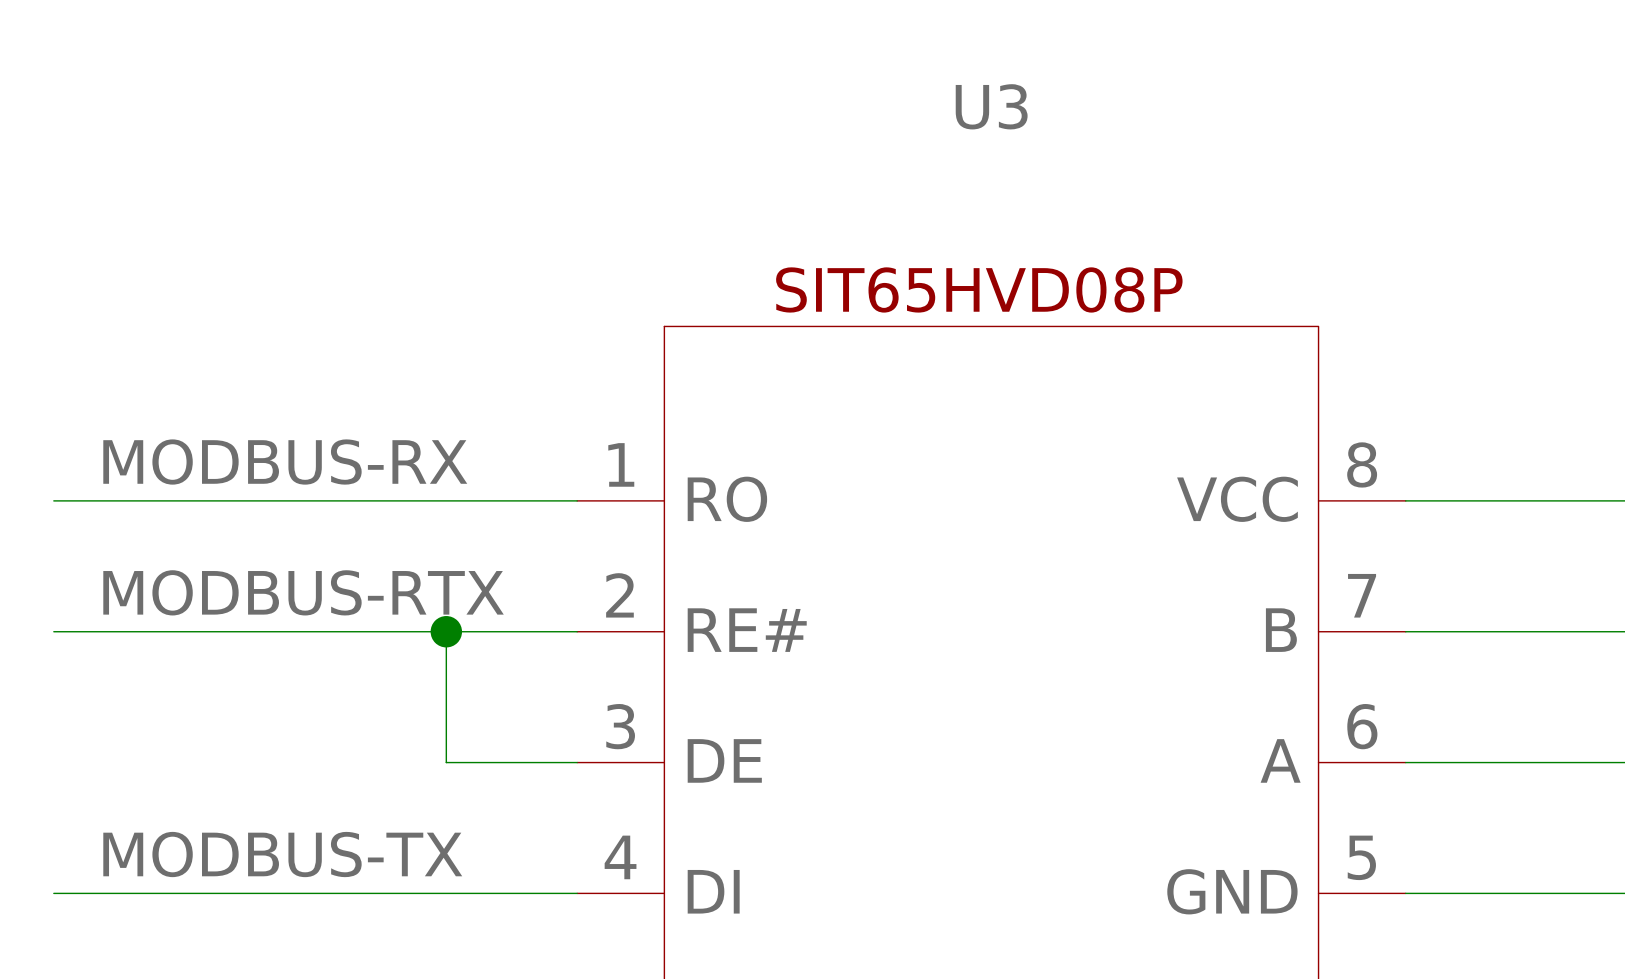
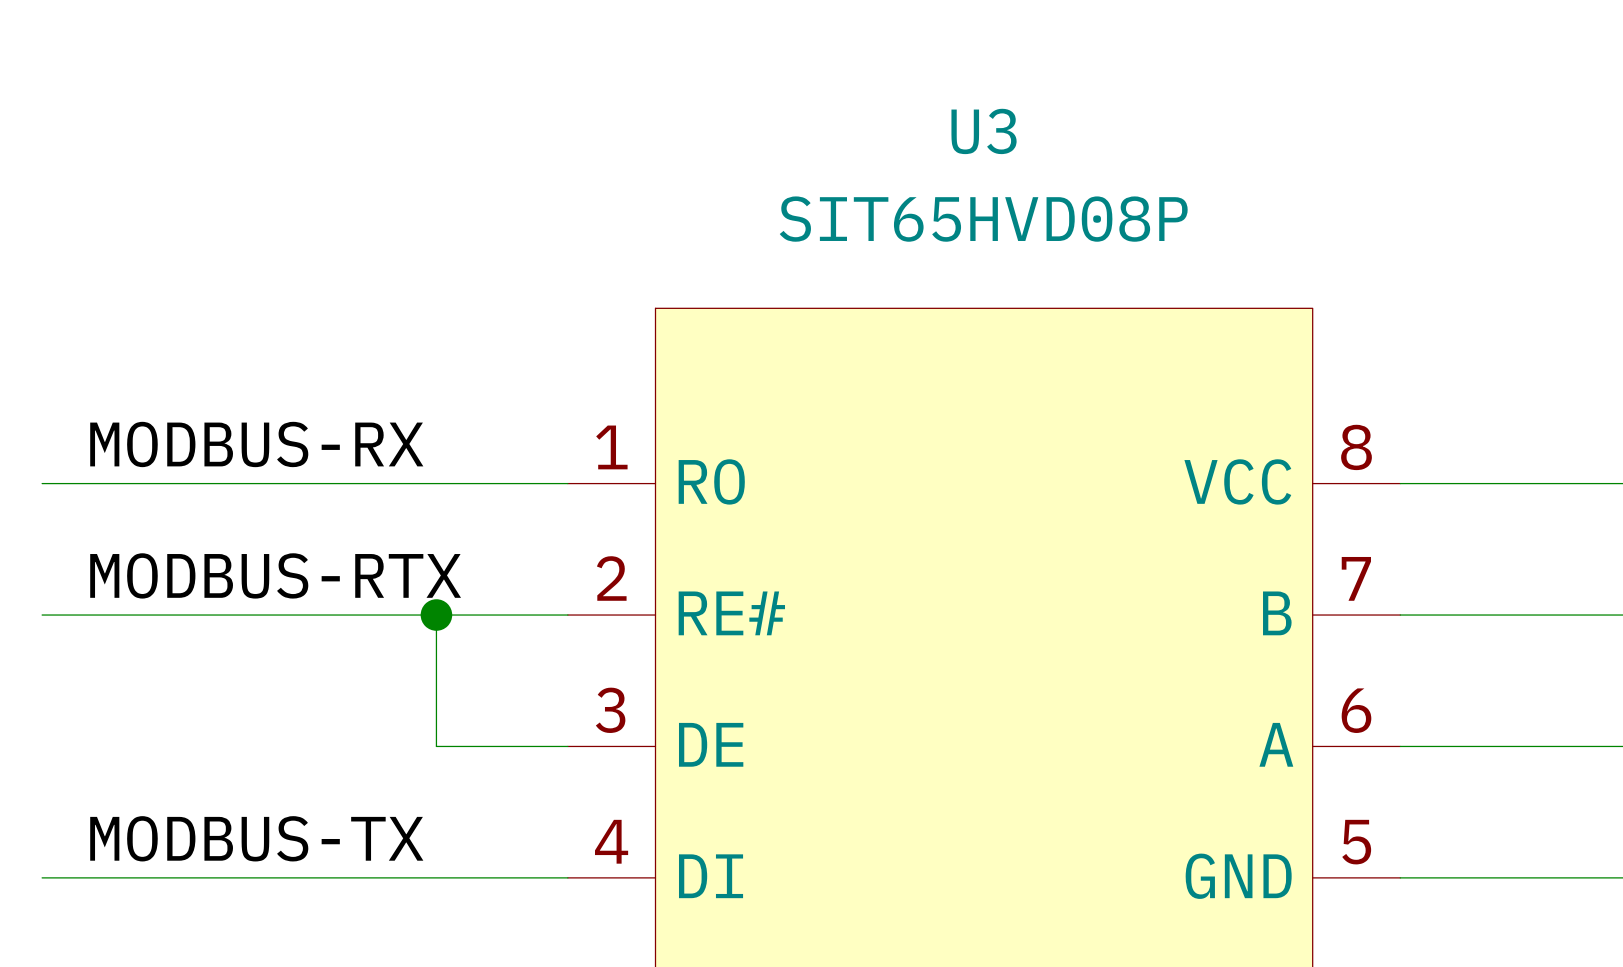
U3 name position: U3 (991, 106) -> U3 (984, 131)
U3 value: none -> SIT65HVD08P (983, 219)
U3 text: SIT65HVD08P (979, 289) -> none

